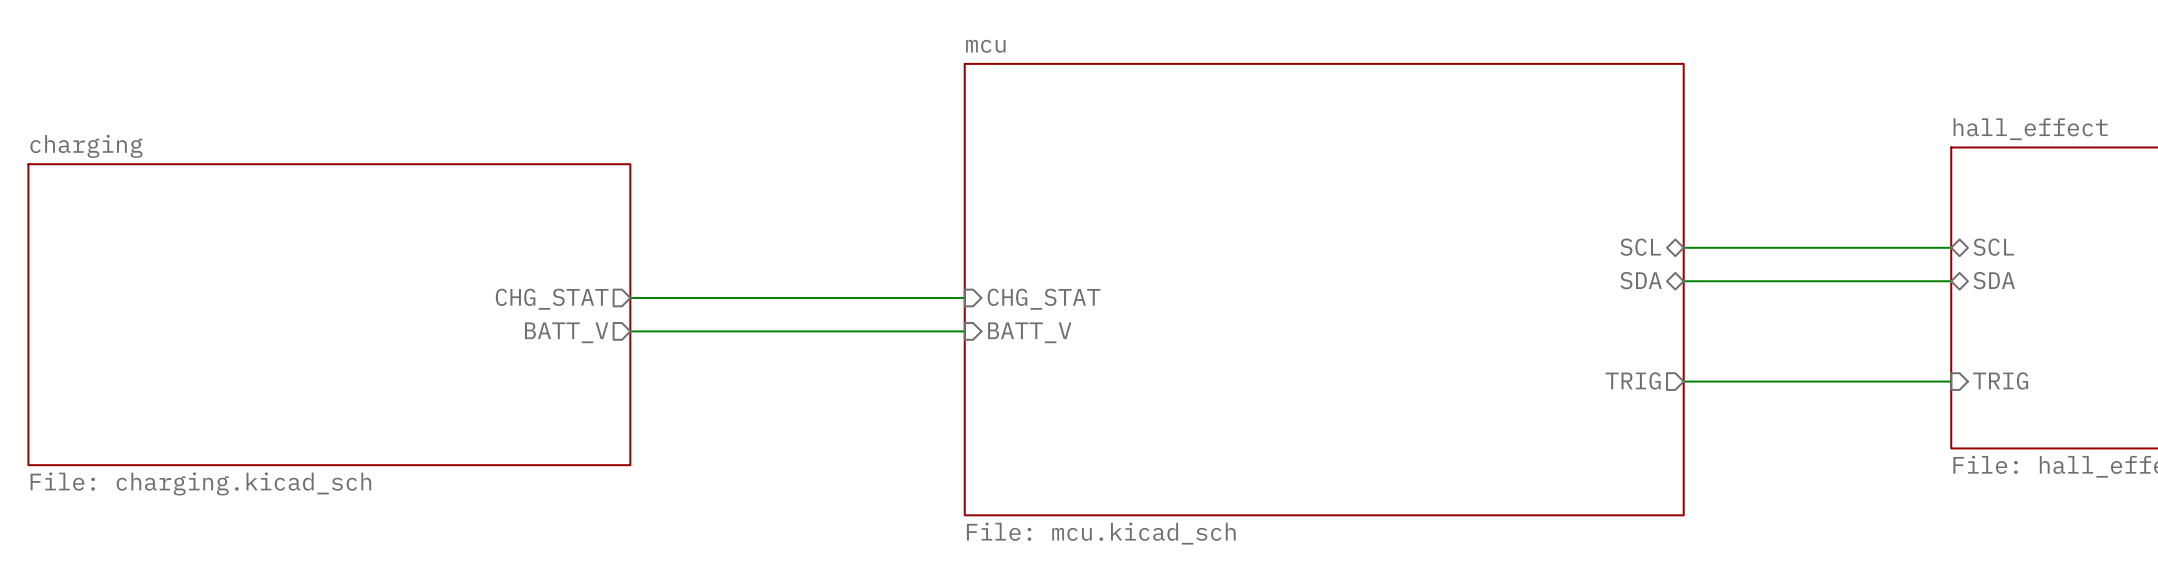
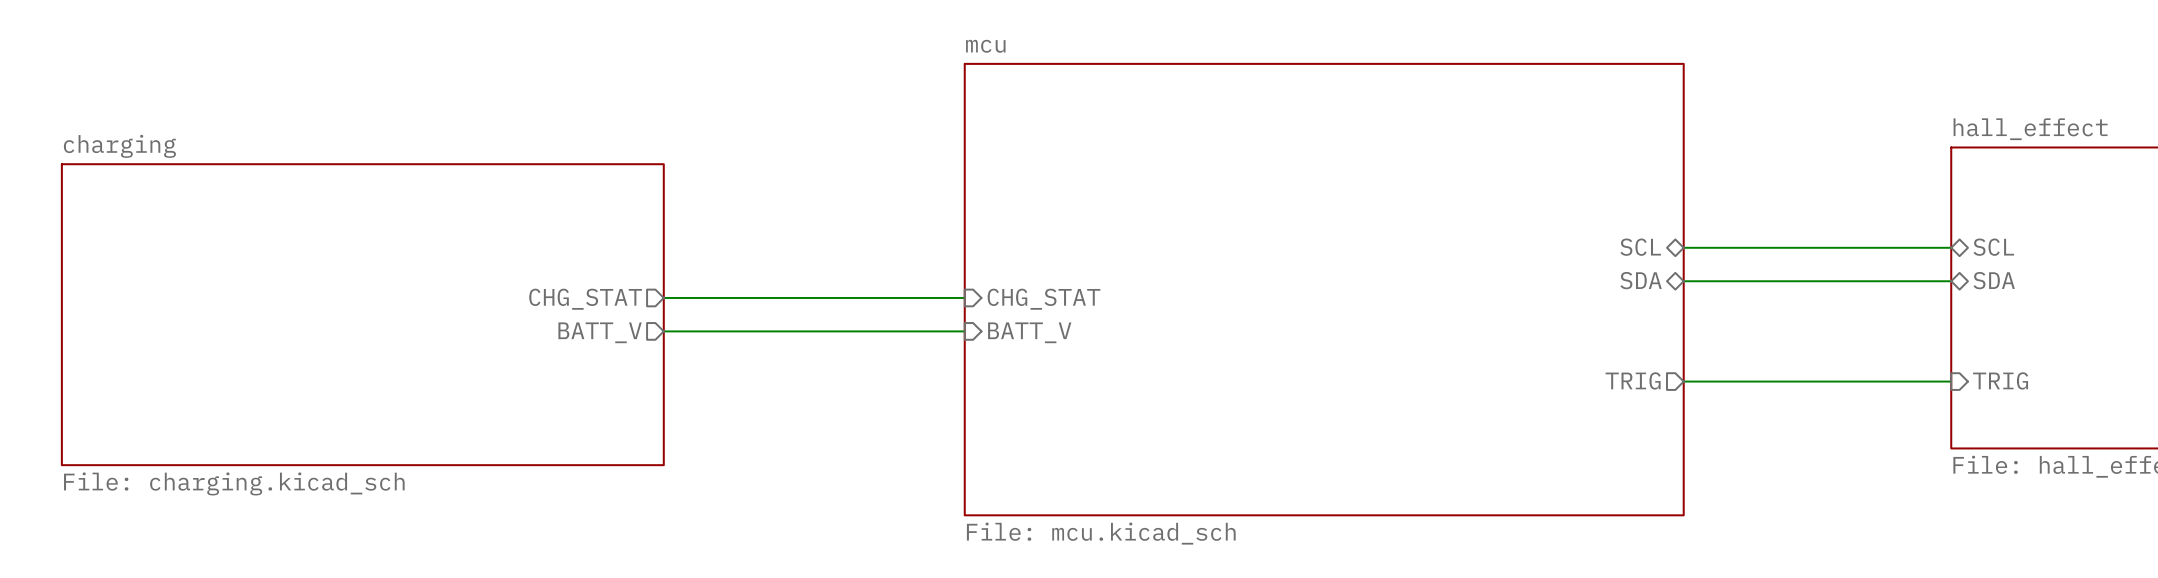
wire: (630, 297) (663, 297) -> none
sheet pin position: CHG_STAT (552, 299) -> CHG_STAT (585, 299)
sheet charging position: (329, 314) -> (362, 314)
wire: (630, 331) (663, 331) -> none
sheet pin position: BATT_V (566, 332) -> BATT_V (600, 332)

